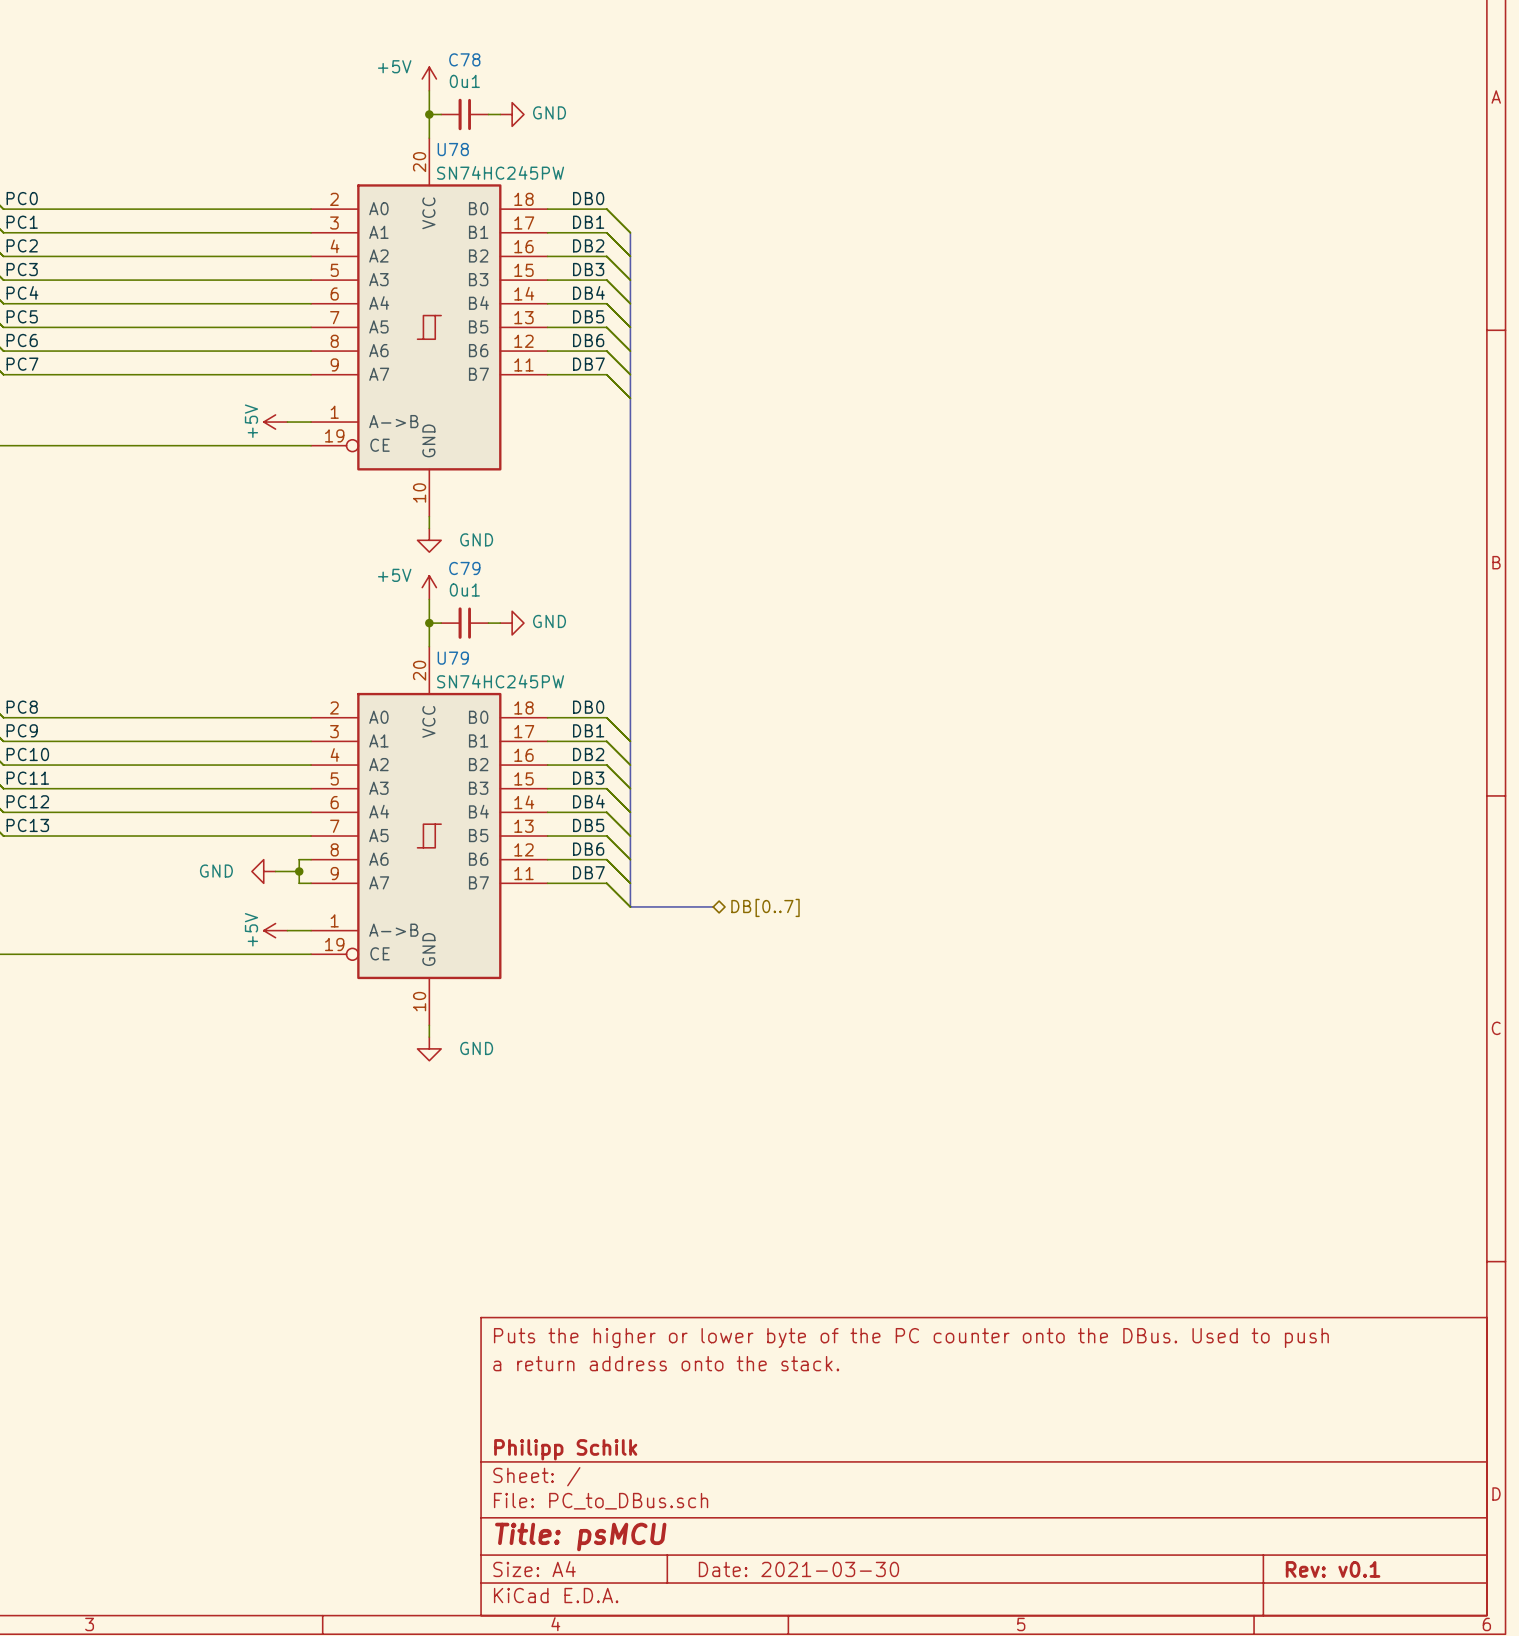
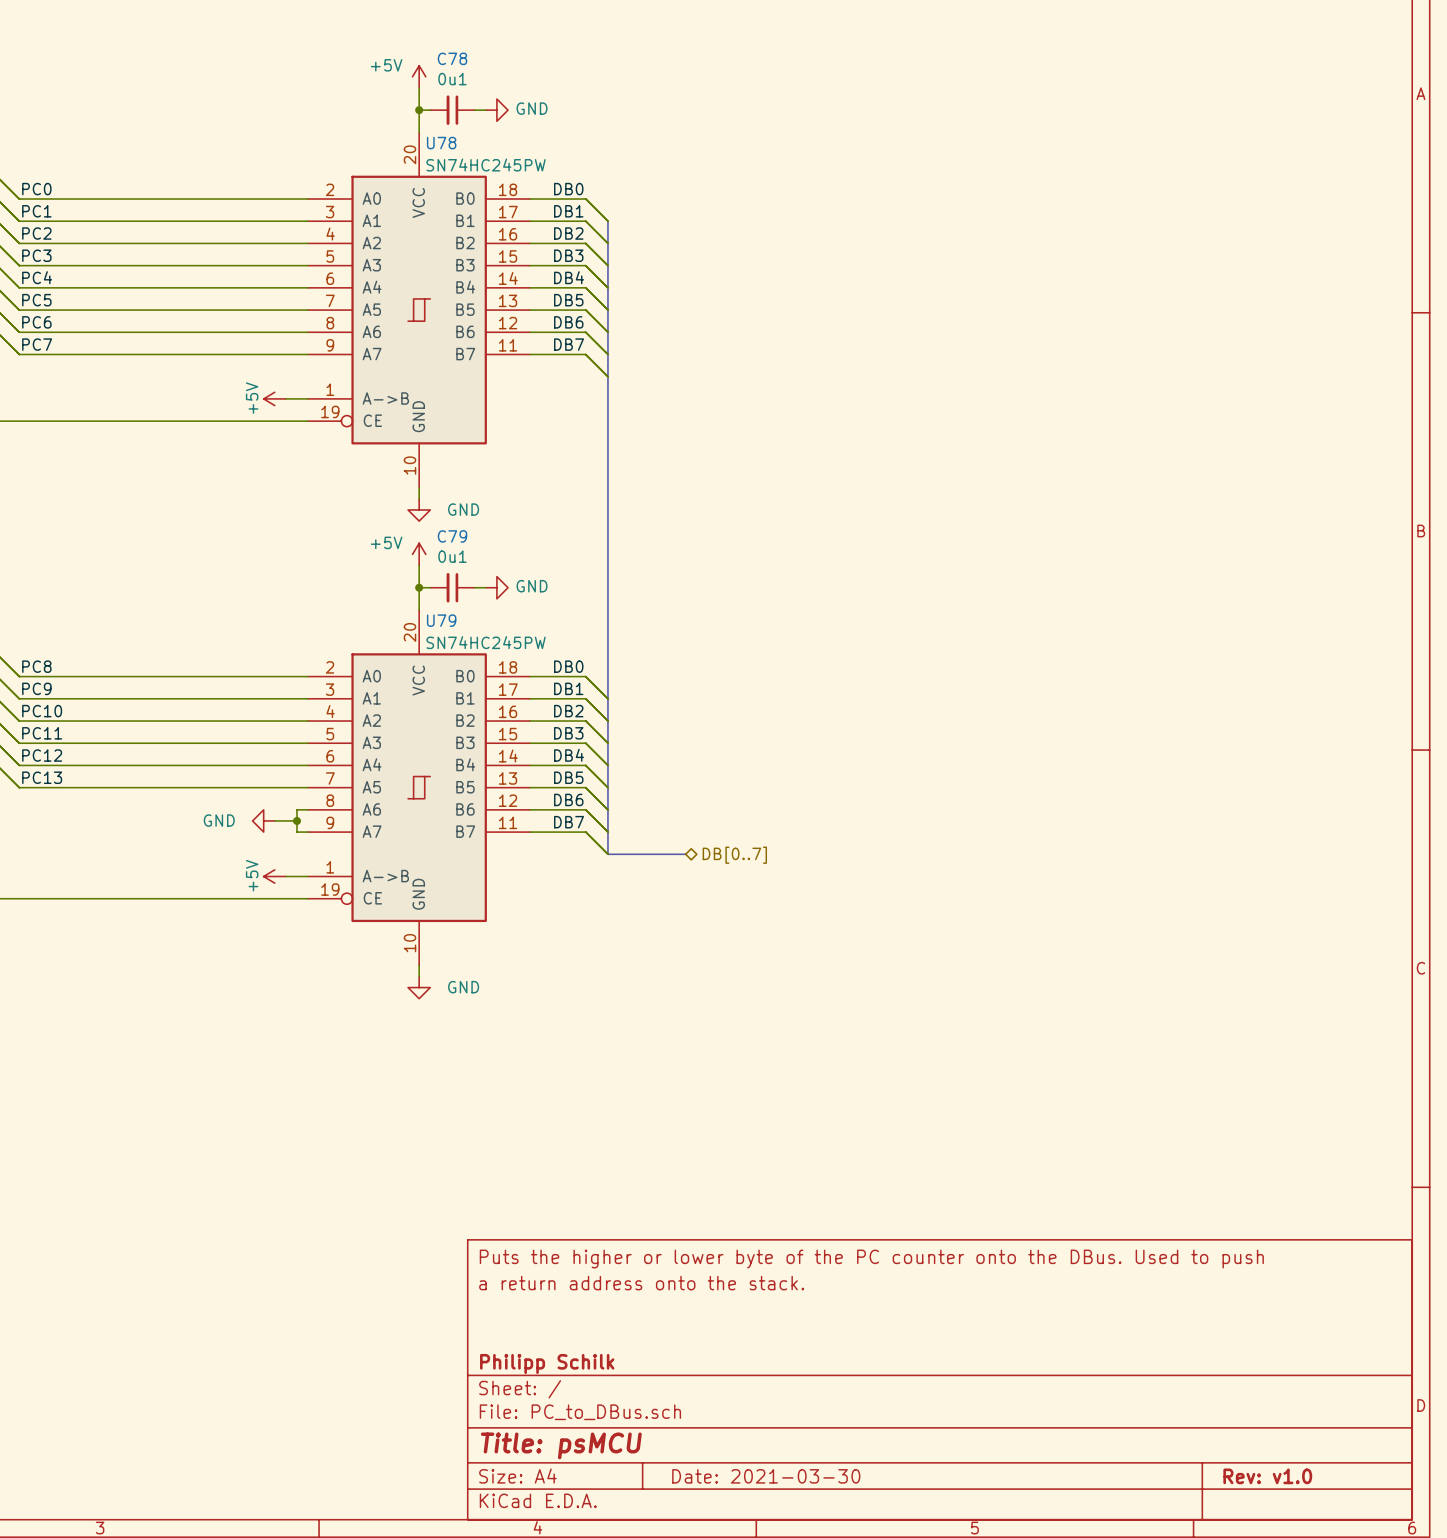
title block: Rev: v0.1 (1333, 1569) -> Rev: v1.0 (1267, 1476)

